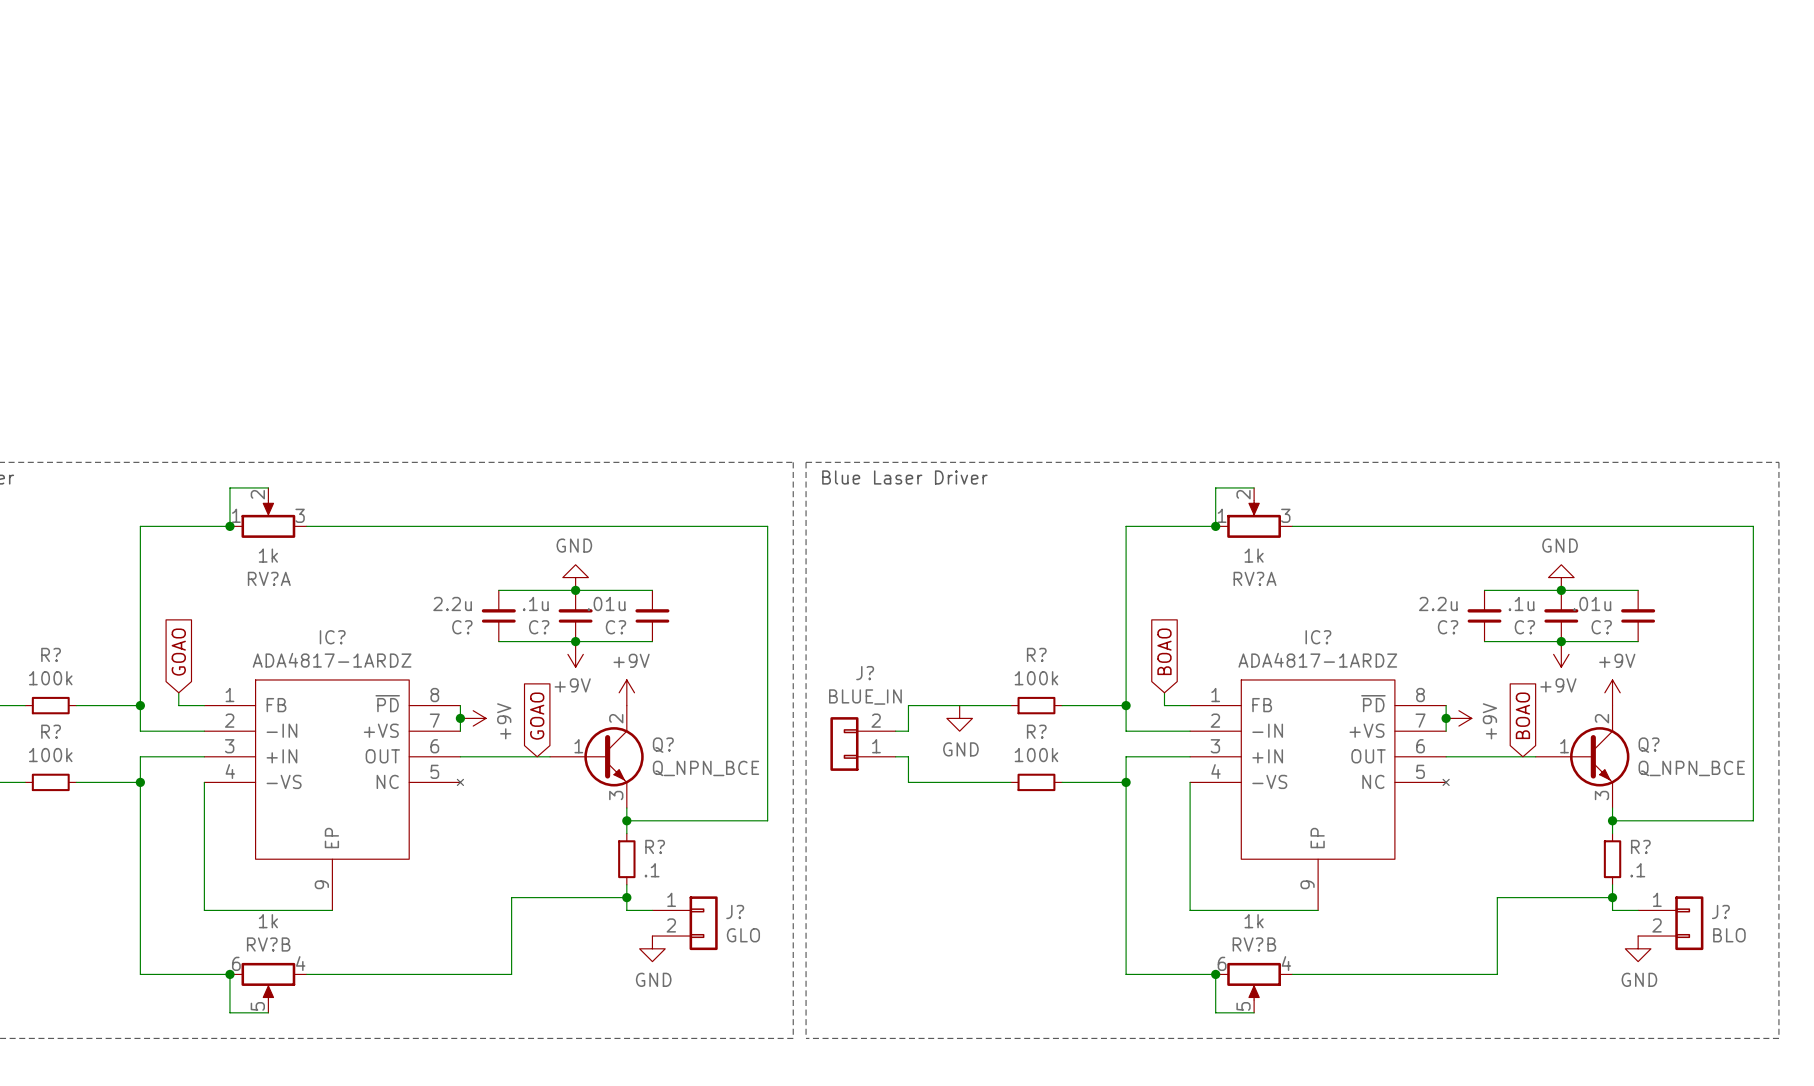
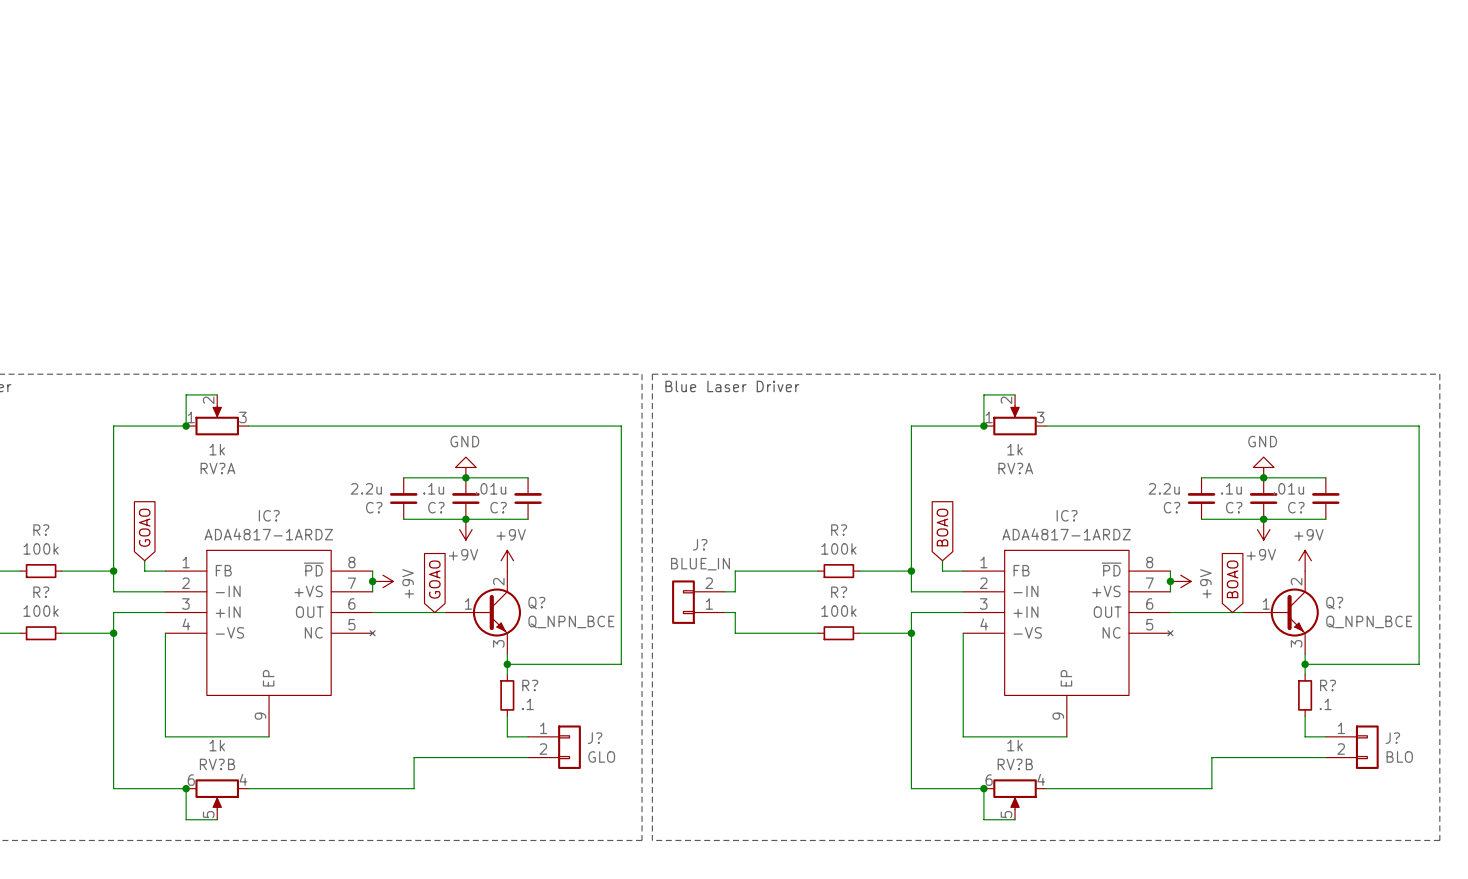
power symbol: GND (959, 718) -> none
wire: (626, 897) (511, 897) (511, 936) -> (528, 757) (414, 757)
junction: (626, 897) -> none
wire: (1612, 897) (1497, 897) (1497, 936) -> (1325, 757) (1211, 757)
junction: (1612, 897) -> none
power symbol: GND (652, 948) -> none
power symbol: GND (1638, 948) -> none

